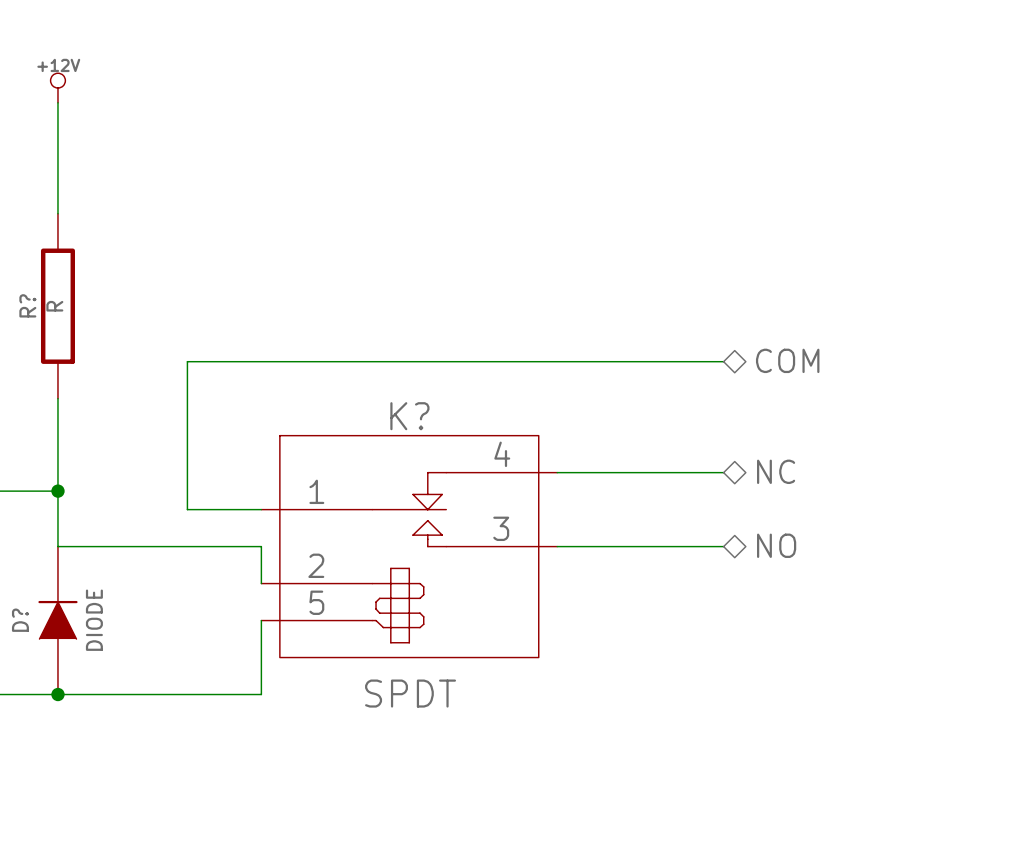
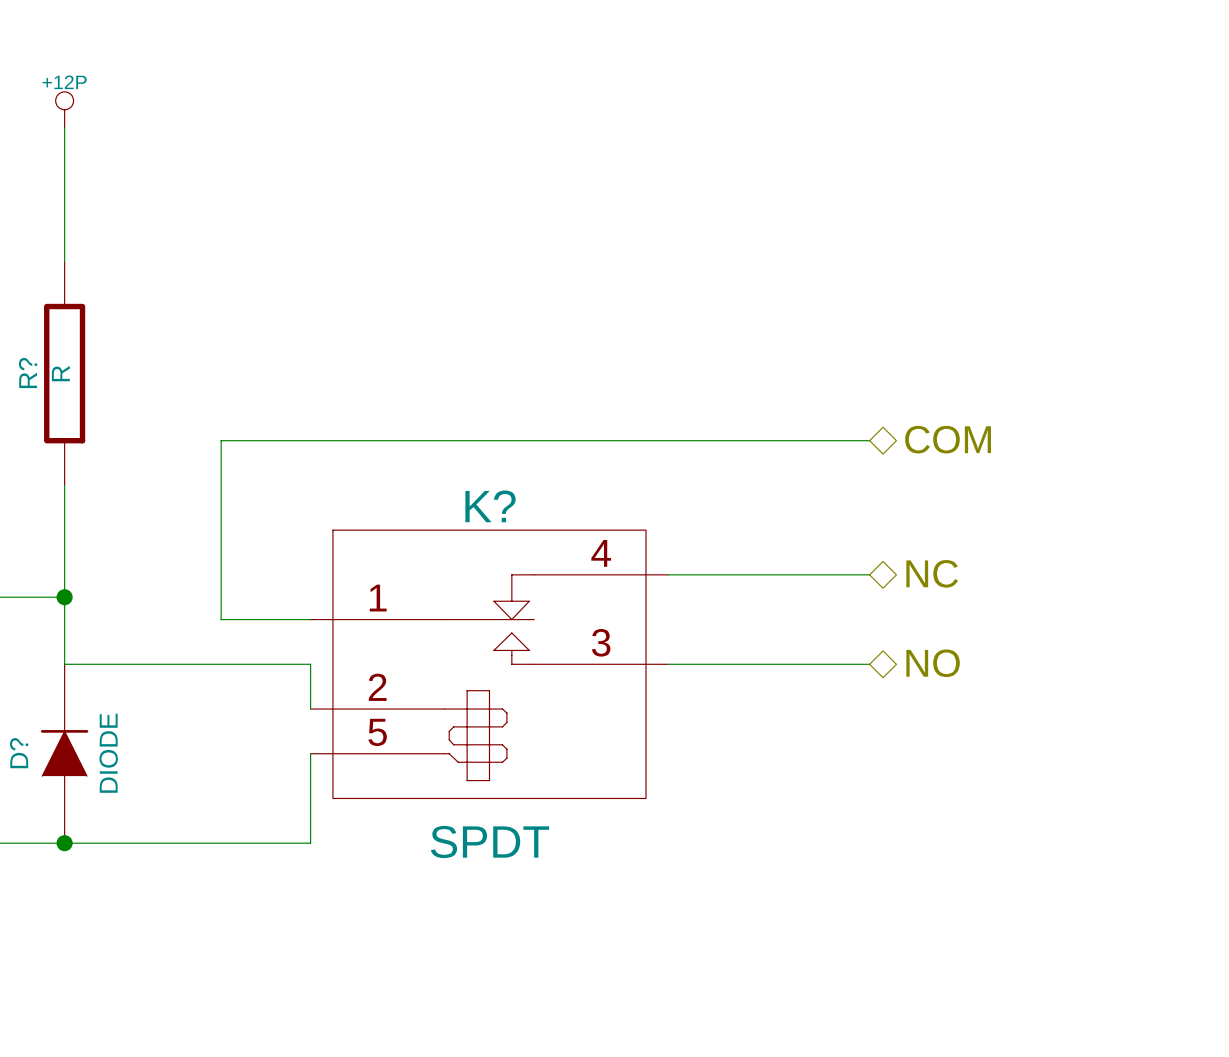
power symbol: +12V (57, 88) -> +12P (64, 109)

